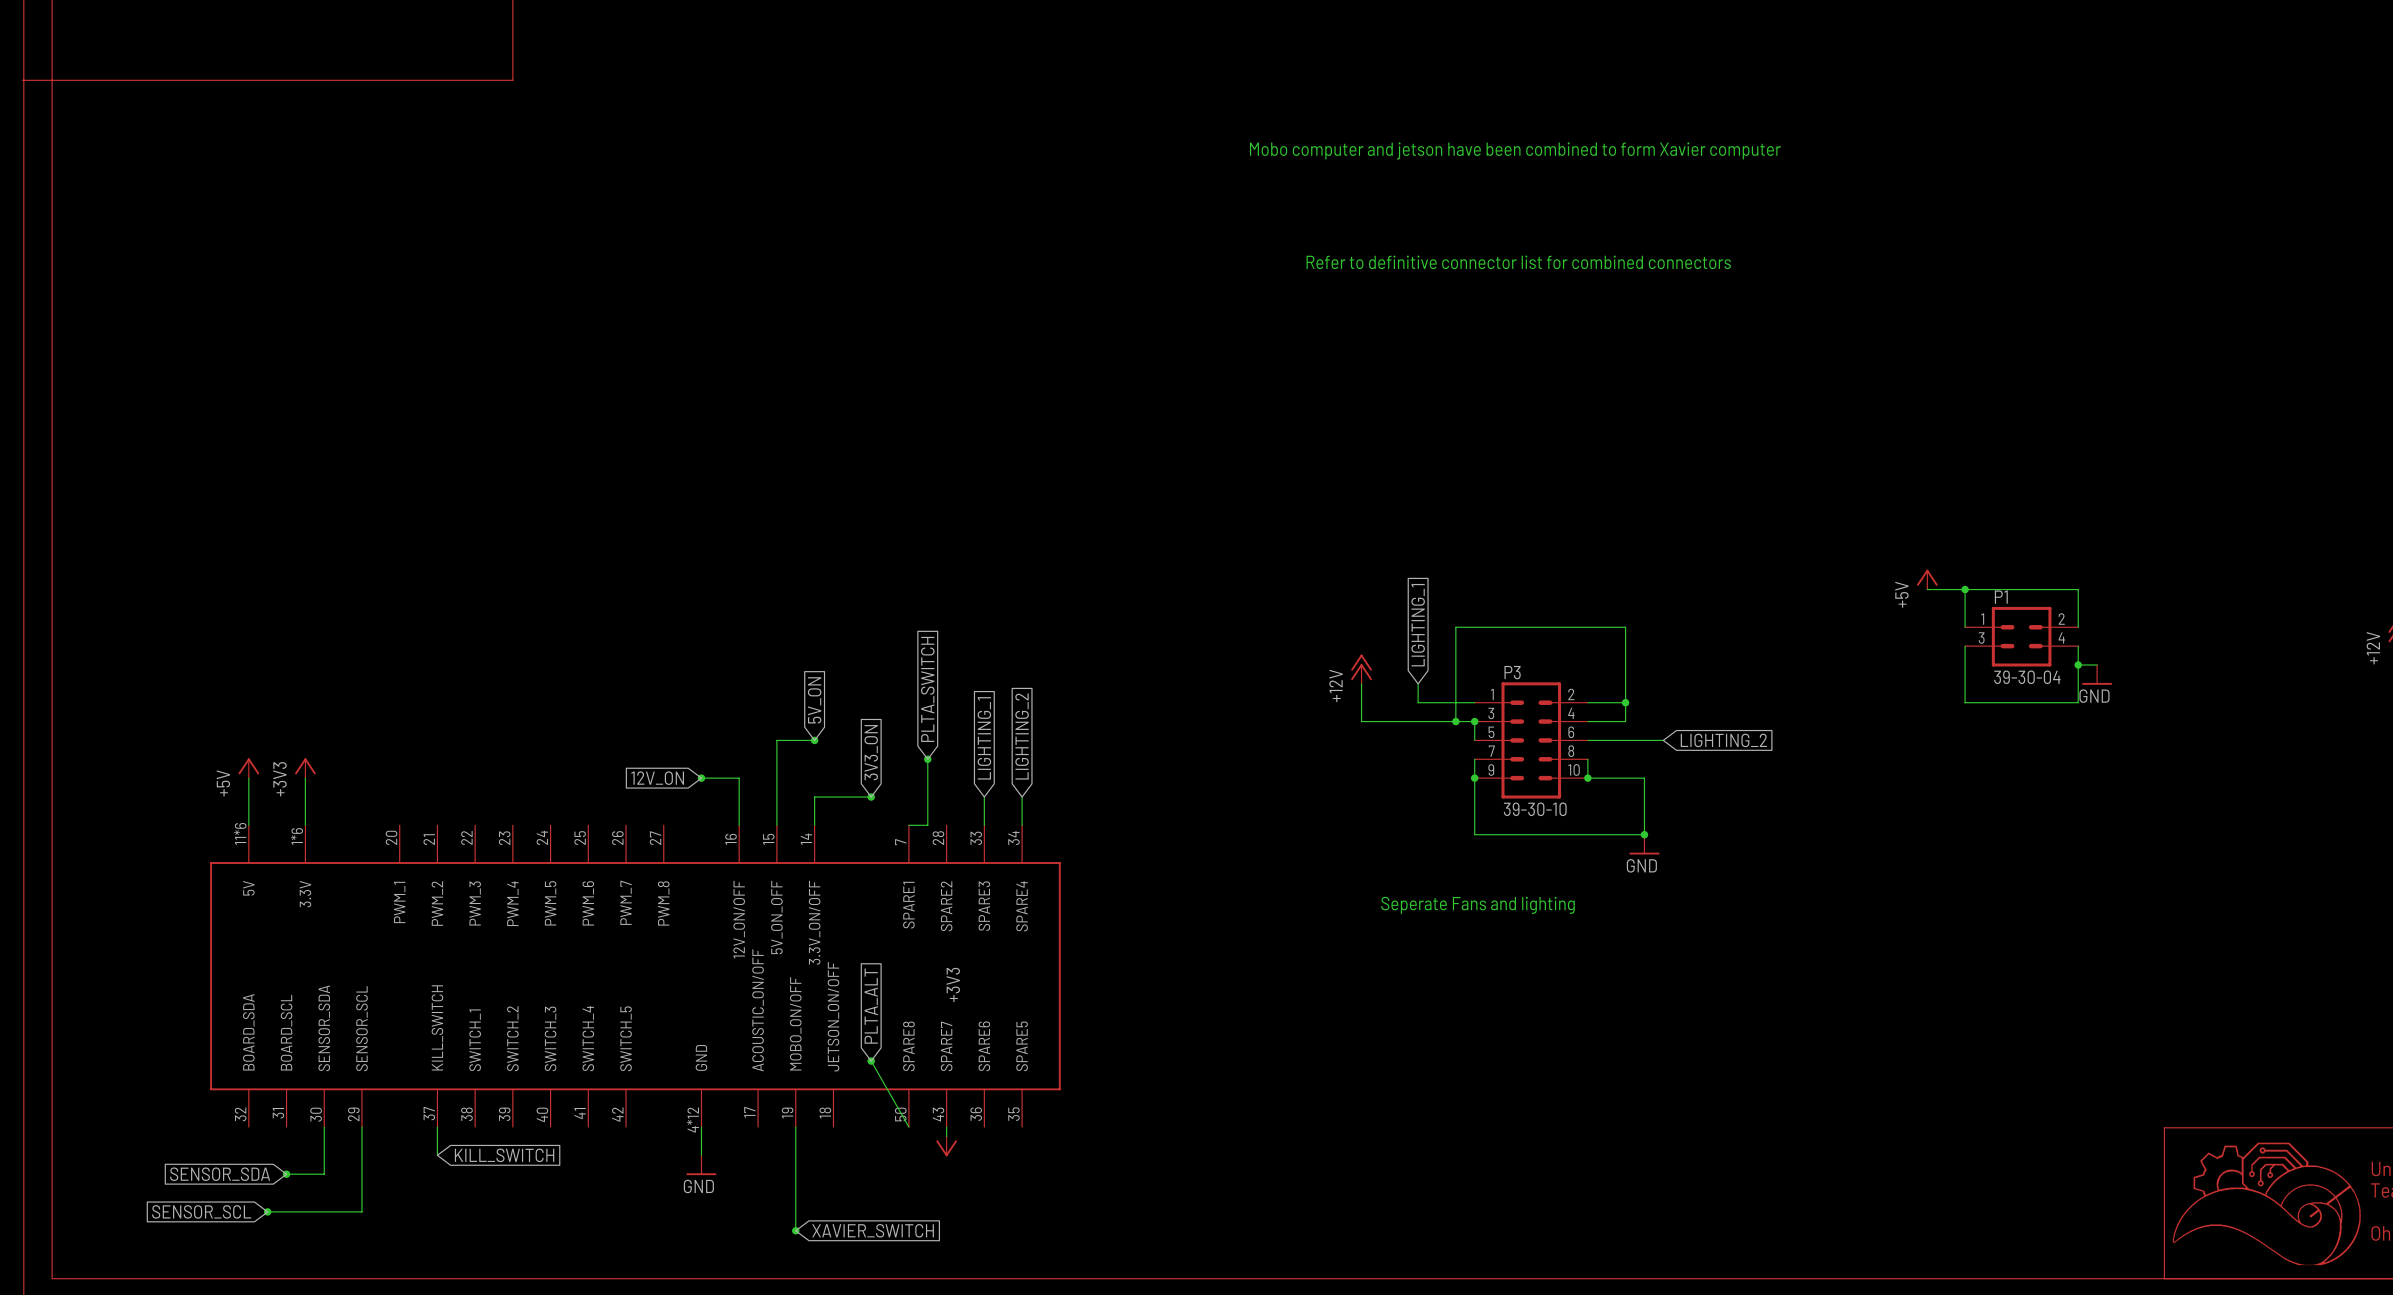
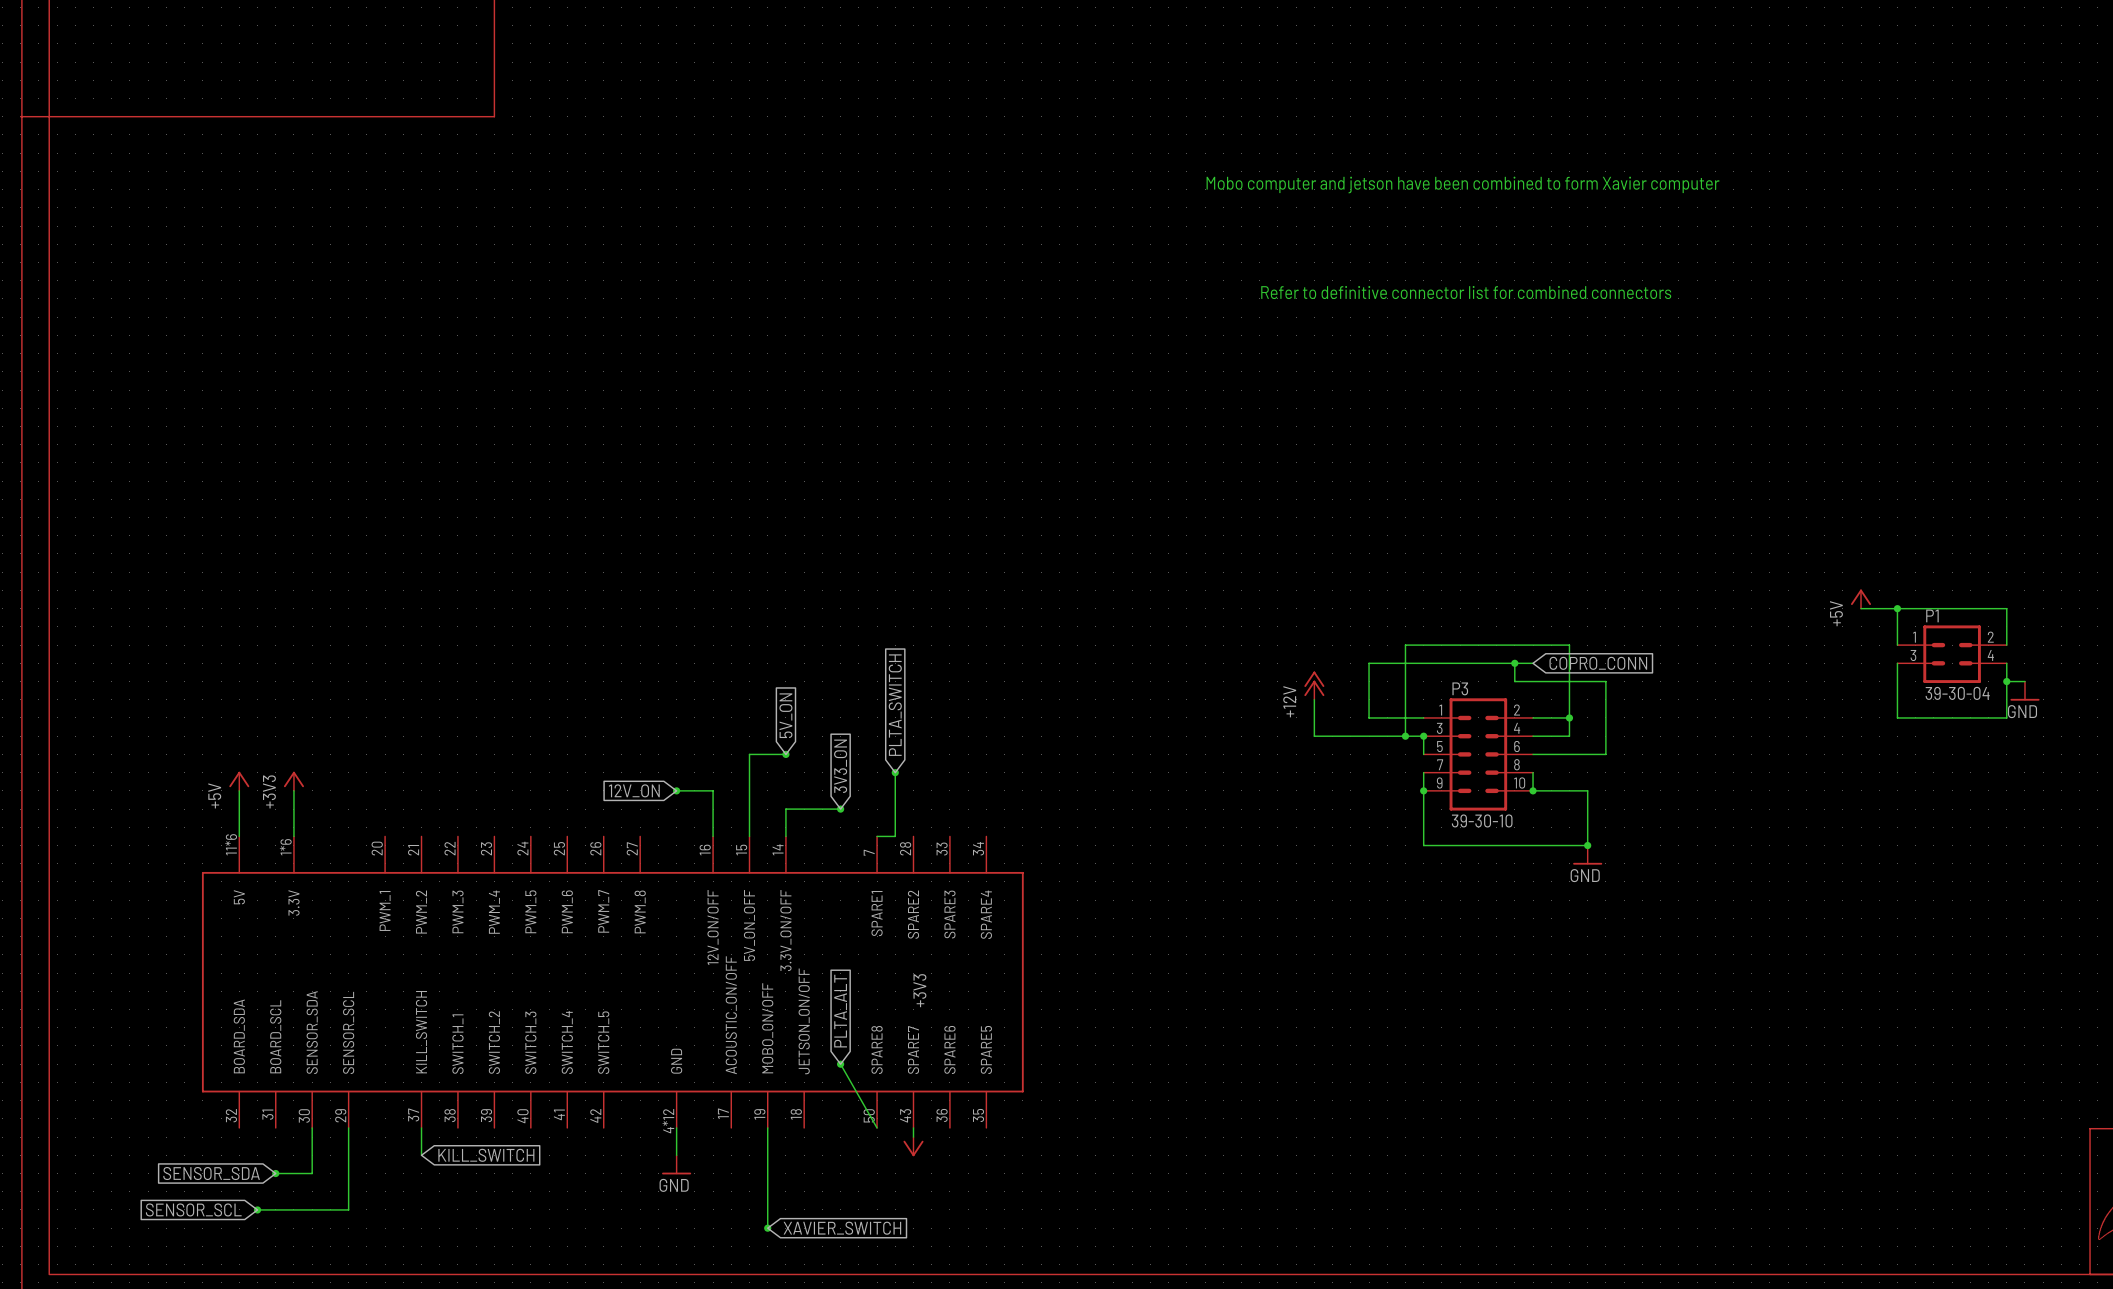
global label: LIGHTING_1 (1418, 625) -> none
wire: none -> (1514, 663) (1514, 681) (1605, 681) (1605, 754)
junction: none -> (1514, 663)
wire: none -> (1533, 663) (1369, 663) (1369, 699)
global label: none -> COPRO_CONN (1598, 663)
global label: LIGHTING_2 (1022, 736) -> none
global label: LIGHTING_1 (984, 738) -> none
global label: LIGHTING_2 (1723, 740) -> none
wire: (984, 797) (984, 825) -> none
wire: (1022, 797) (1022, 825) -> none
text: Seperate Fans and lighting (1478, 905) -> none

